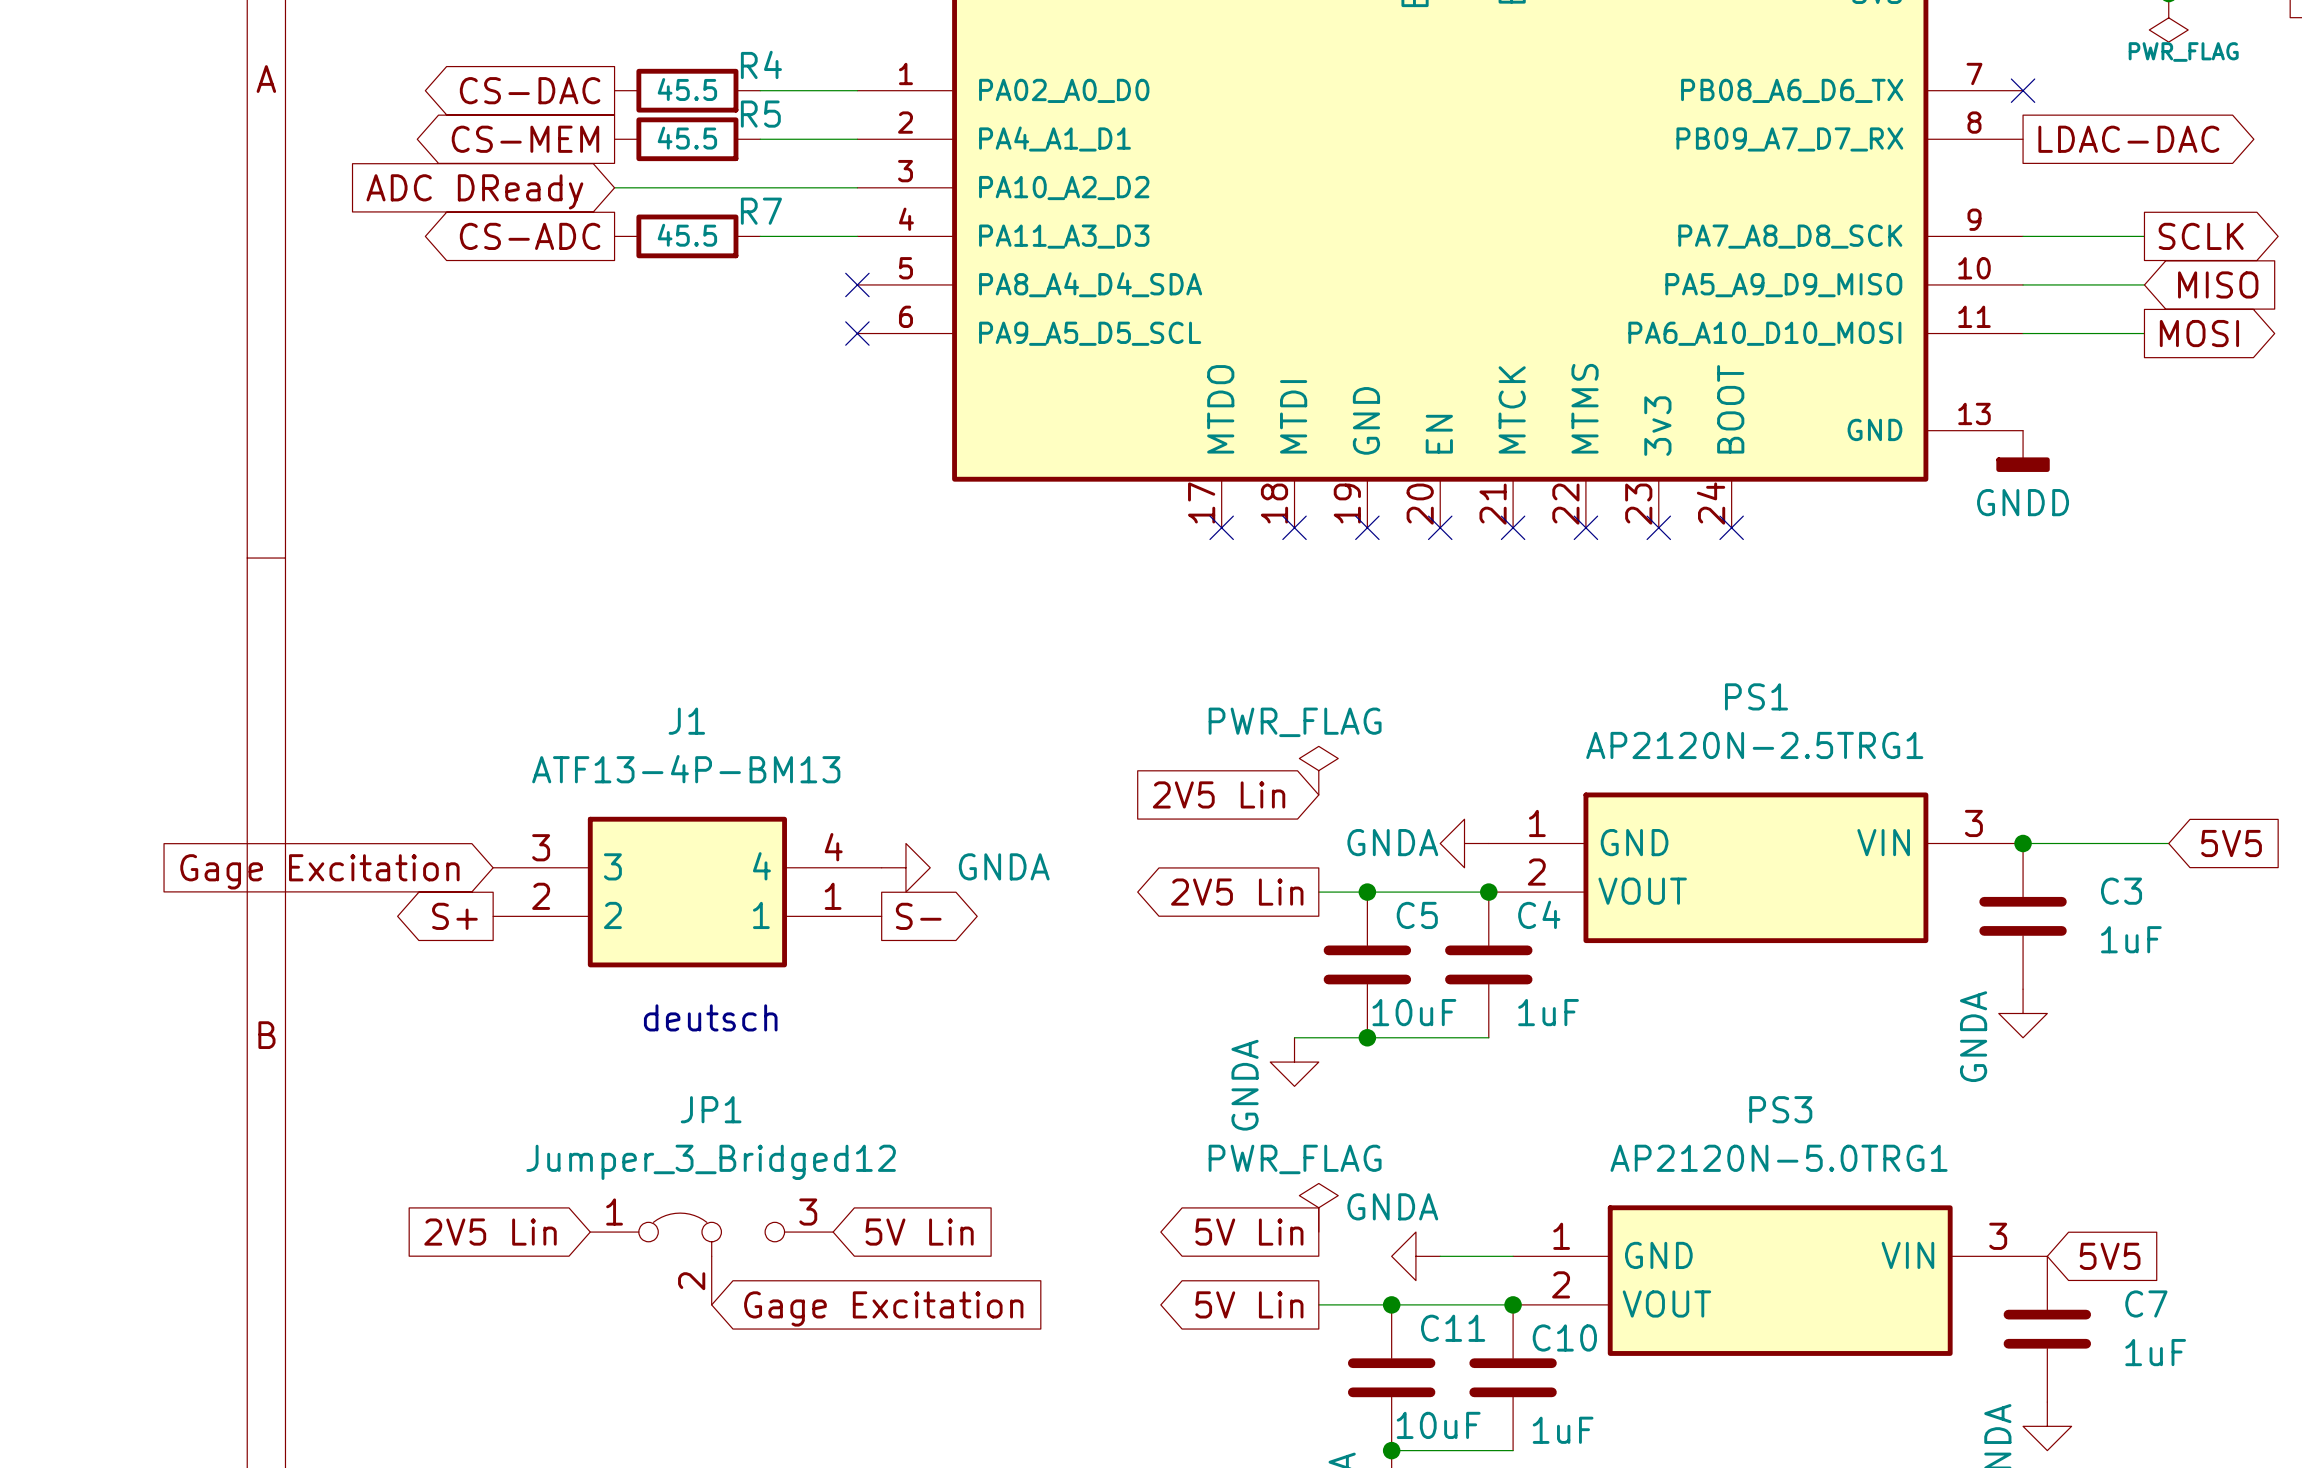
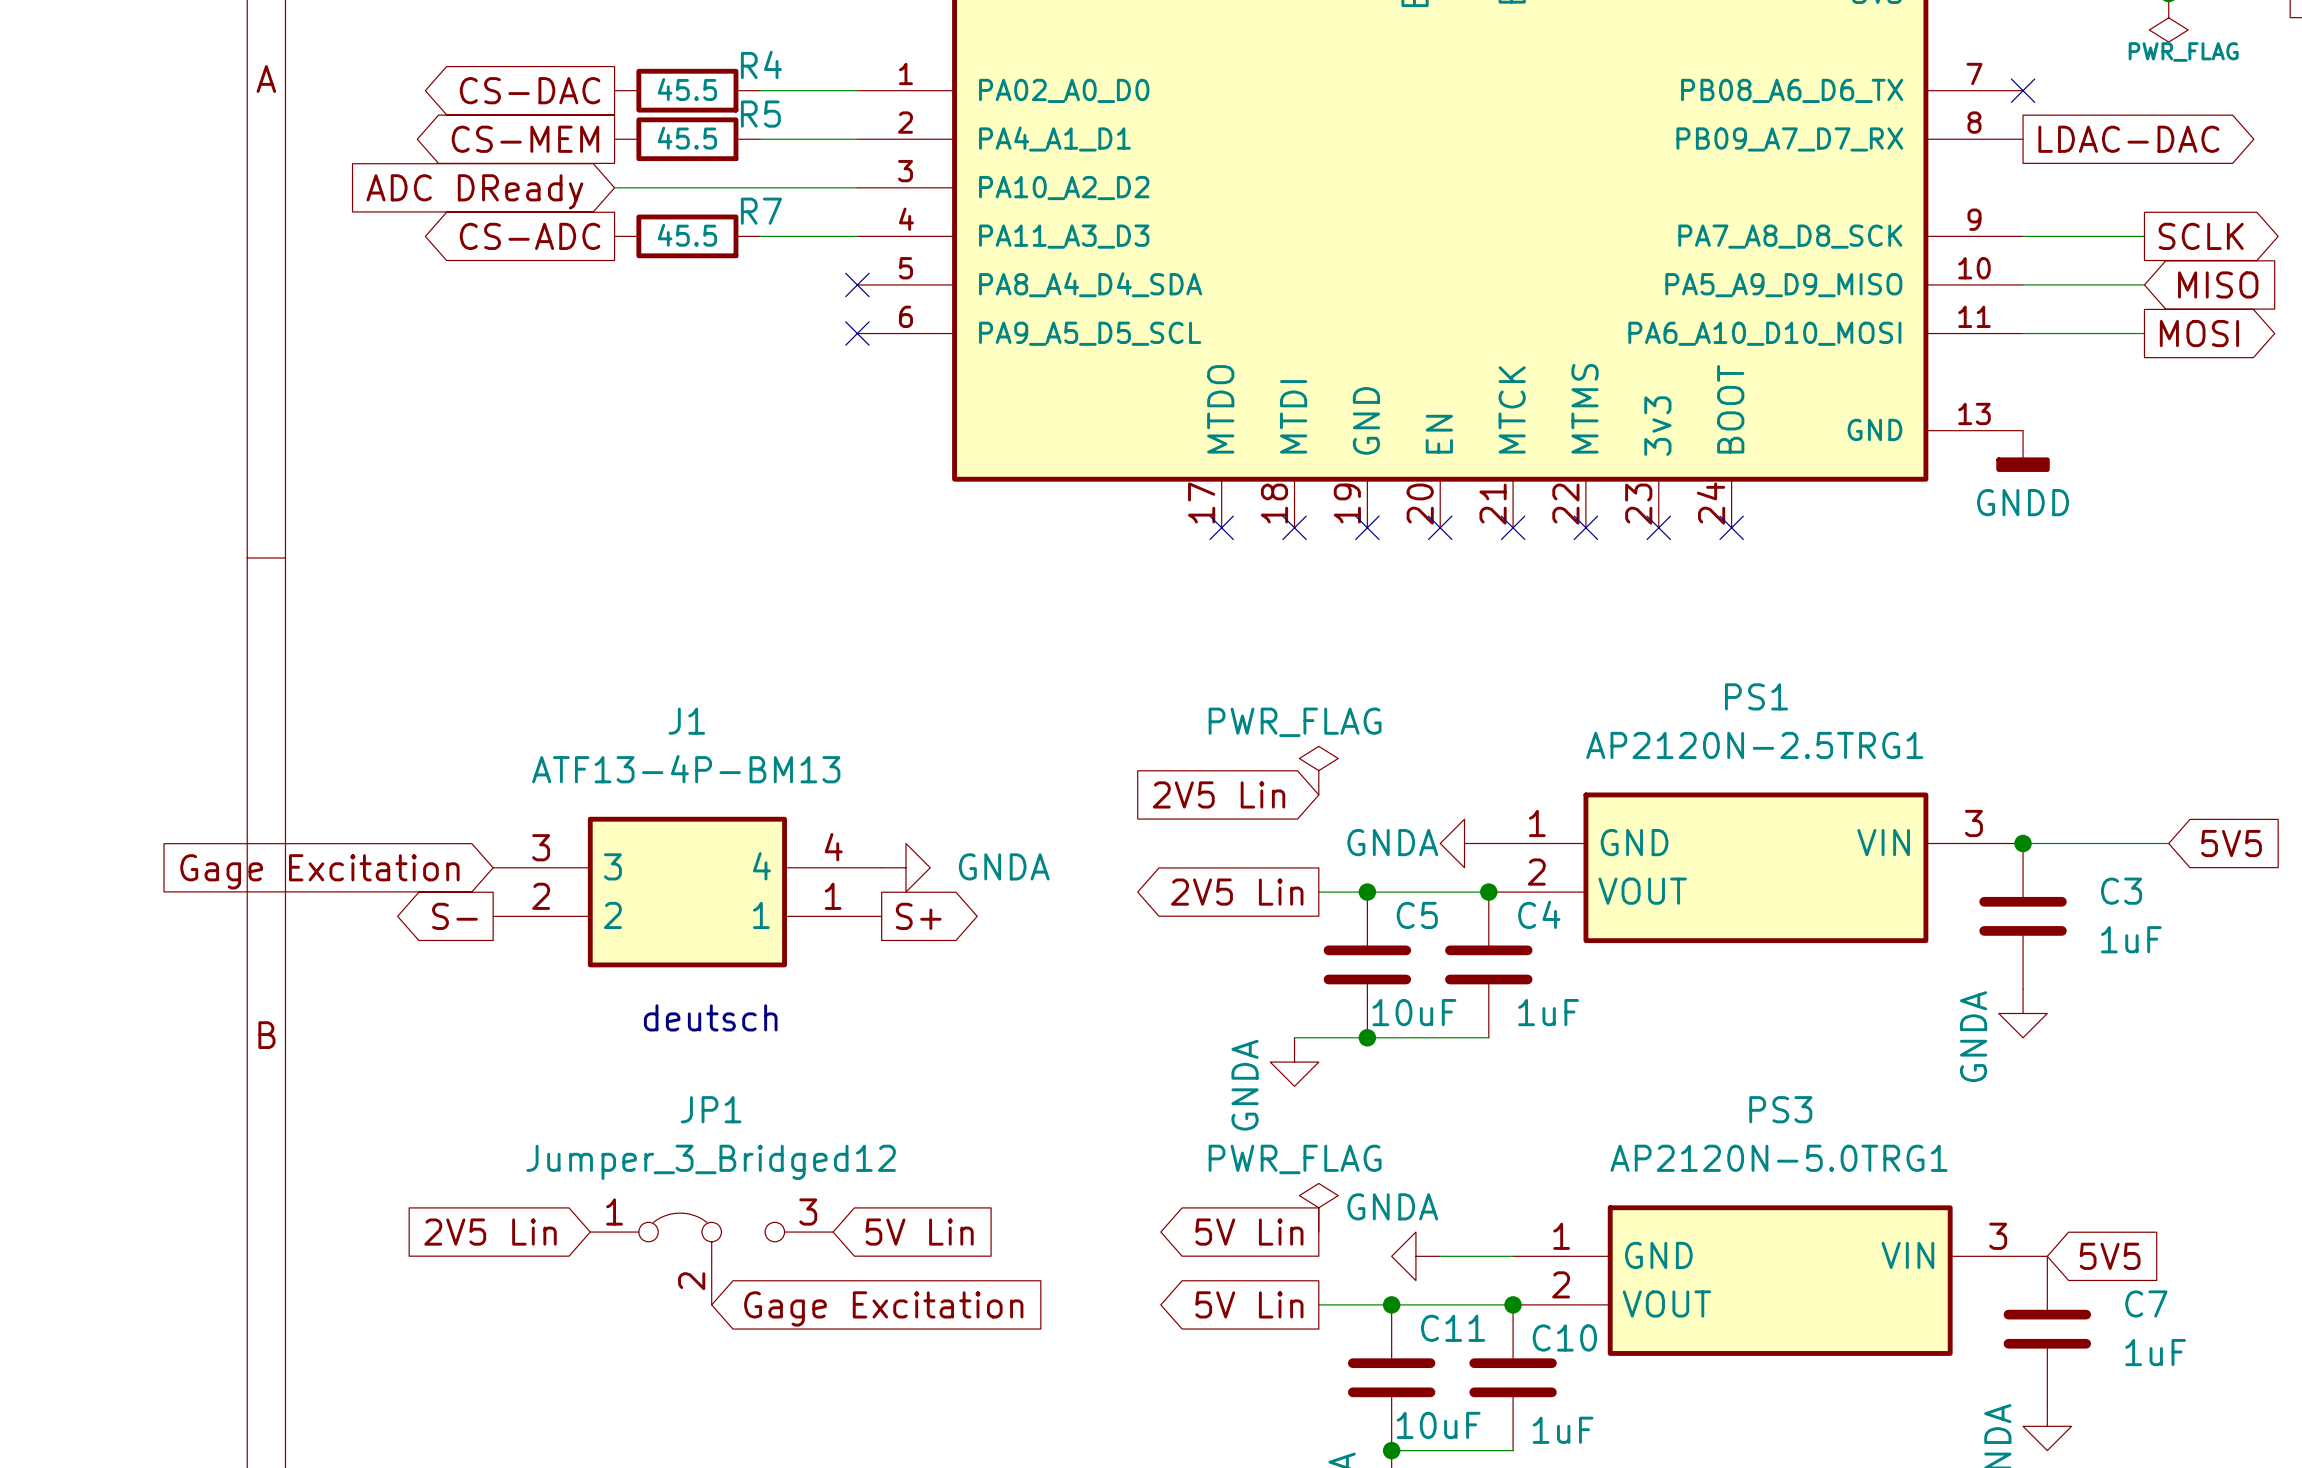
global label: S+ (454, 916) -> S- (454, 916)
global label: S- (918, 916) -> S+ (918, 916)

